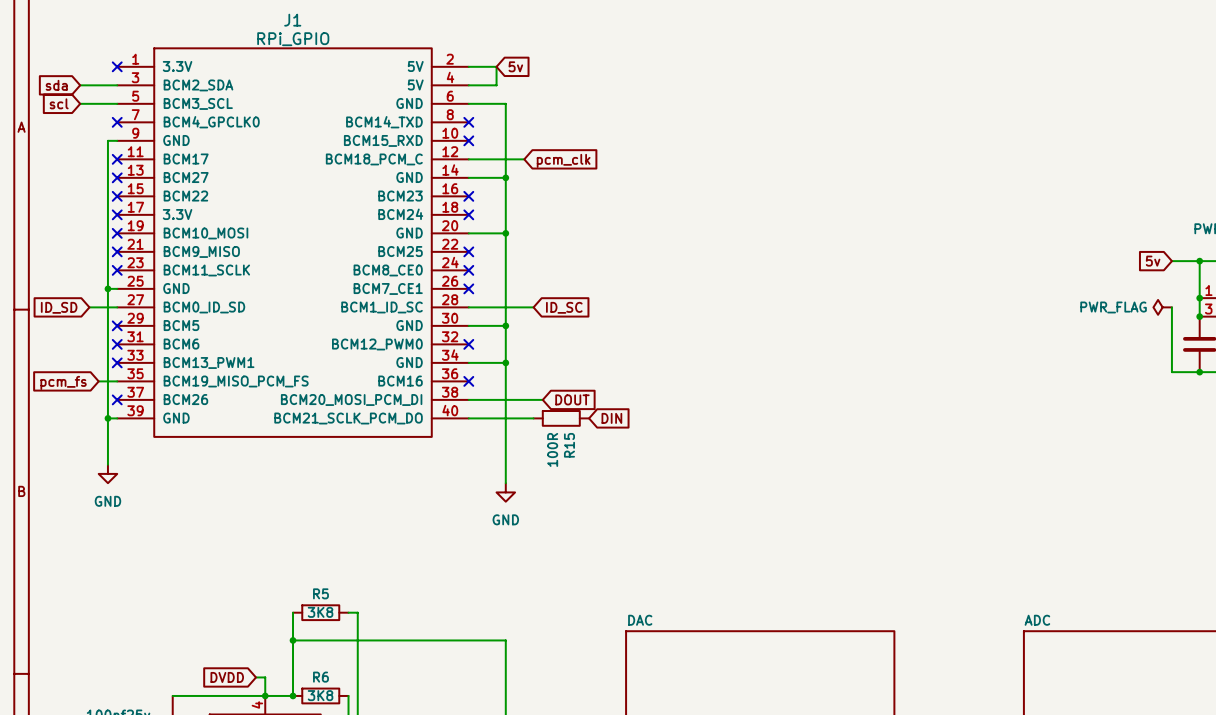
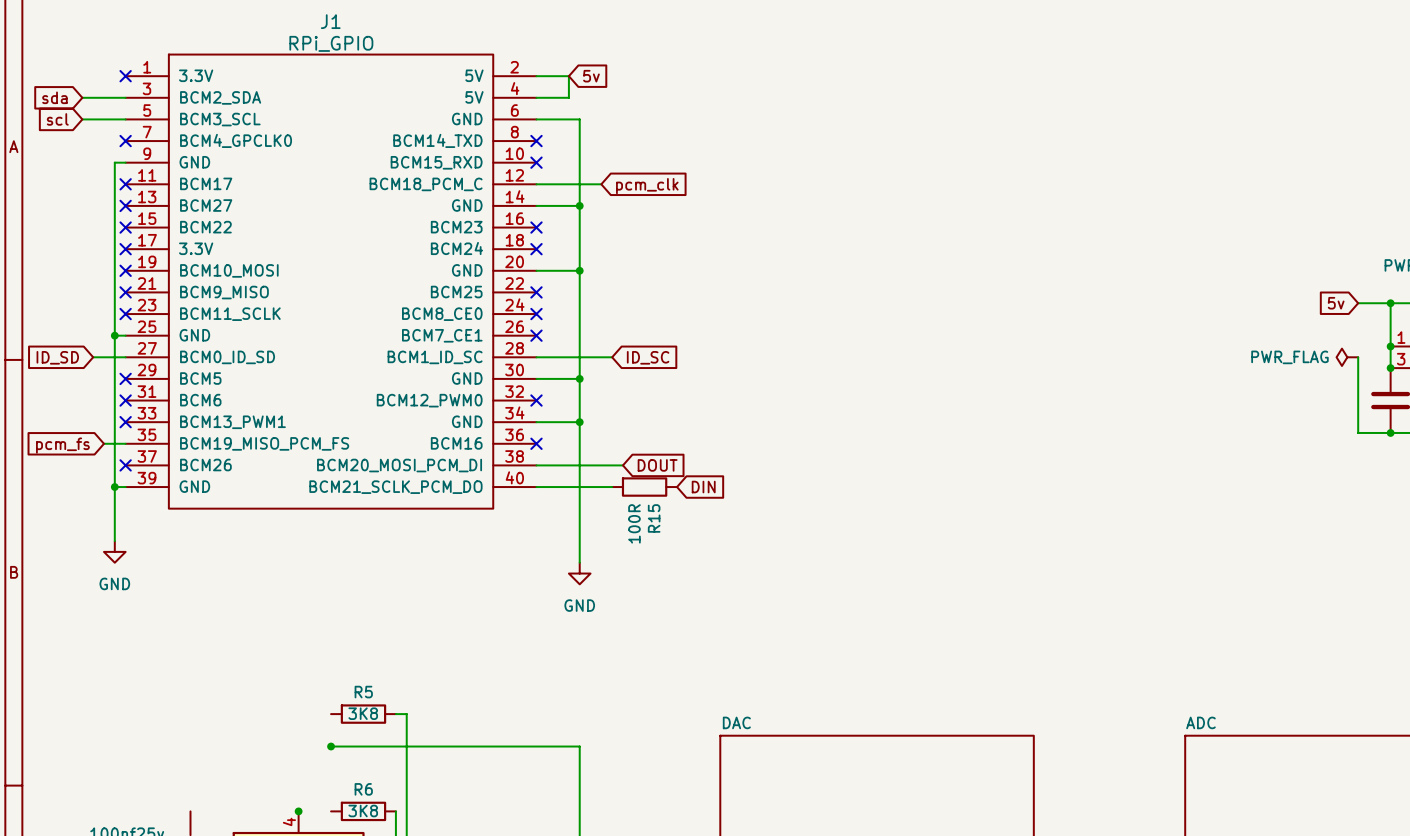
wire: (293, 612) (293, 695) (172, 695) -> none
global label: DVDD (227, 677) -> none
wire: (256, 677) (265, 677) (265, 695) -> none
junction: (293, 695) -> none

